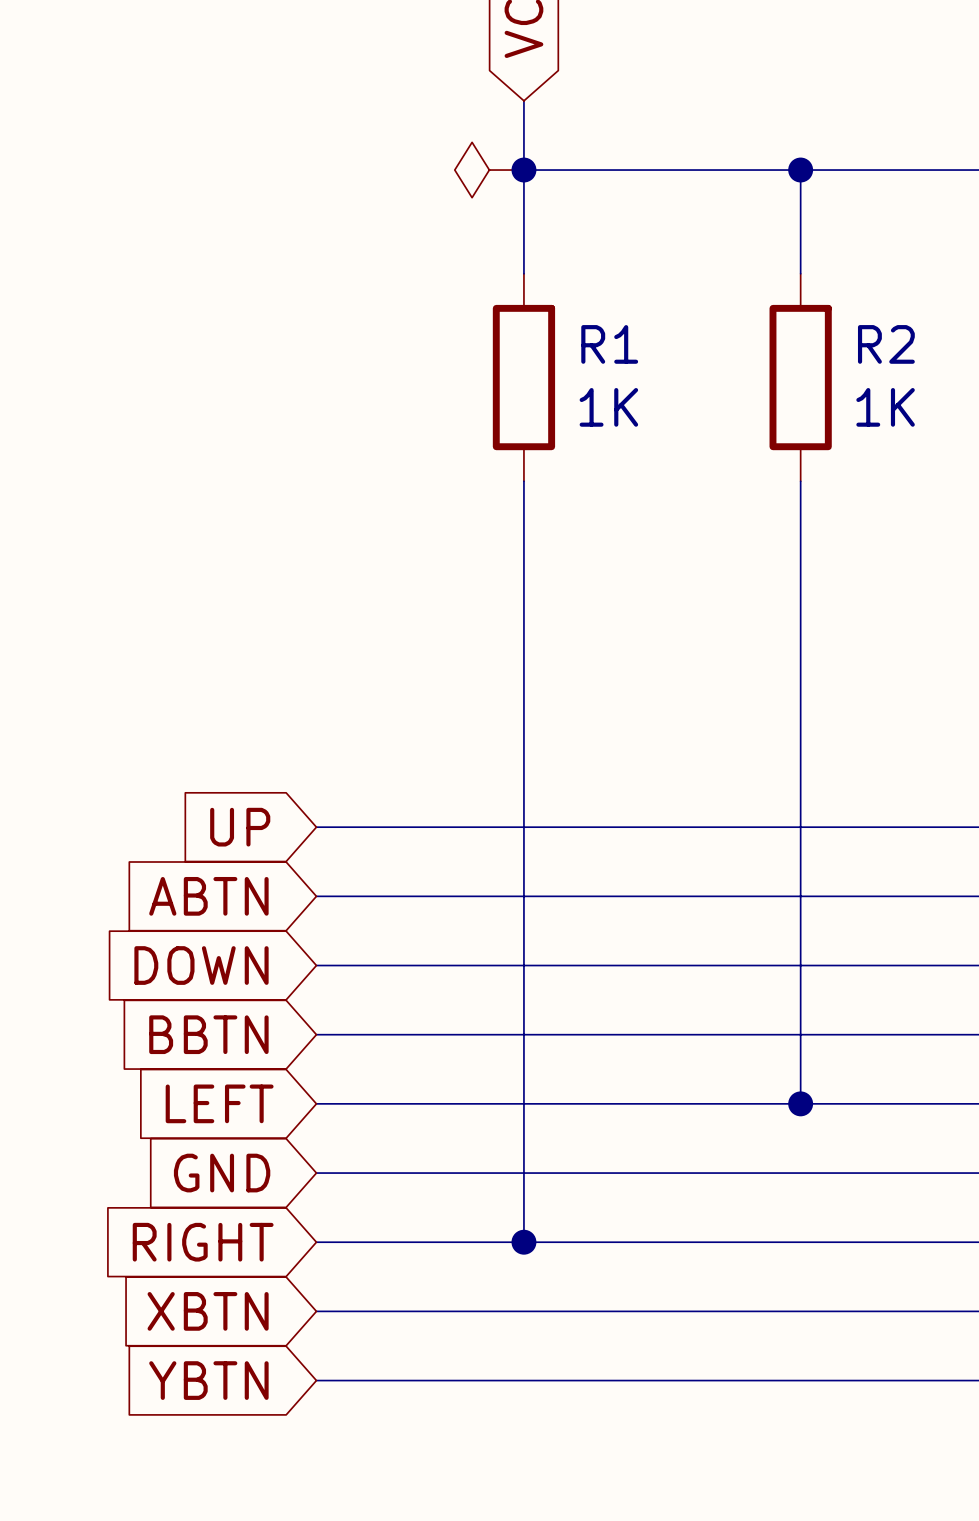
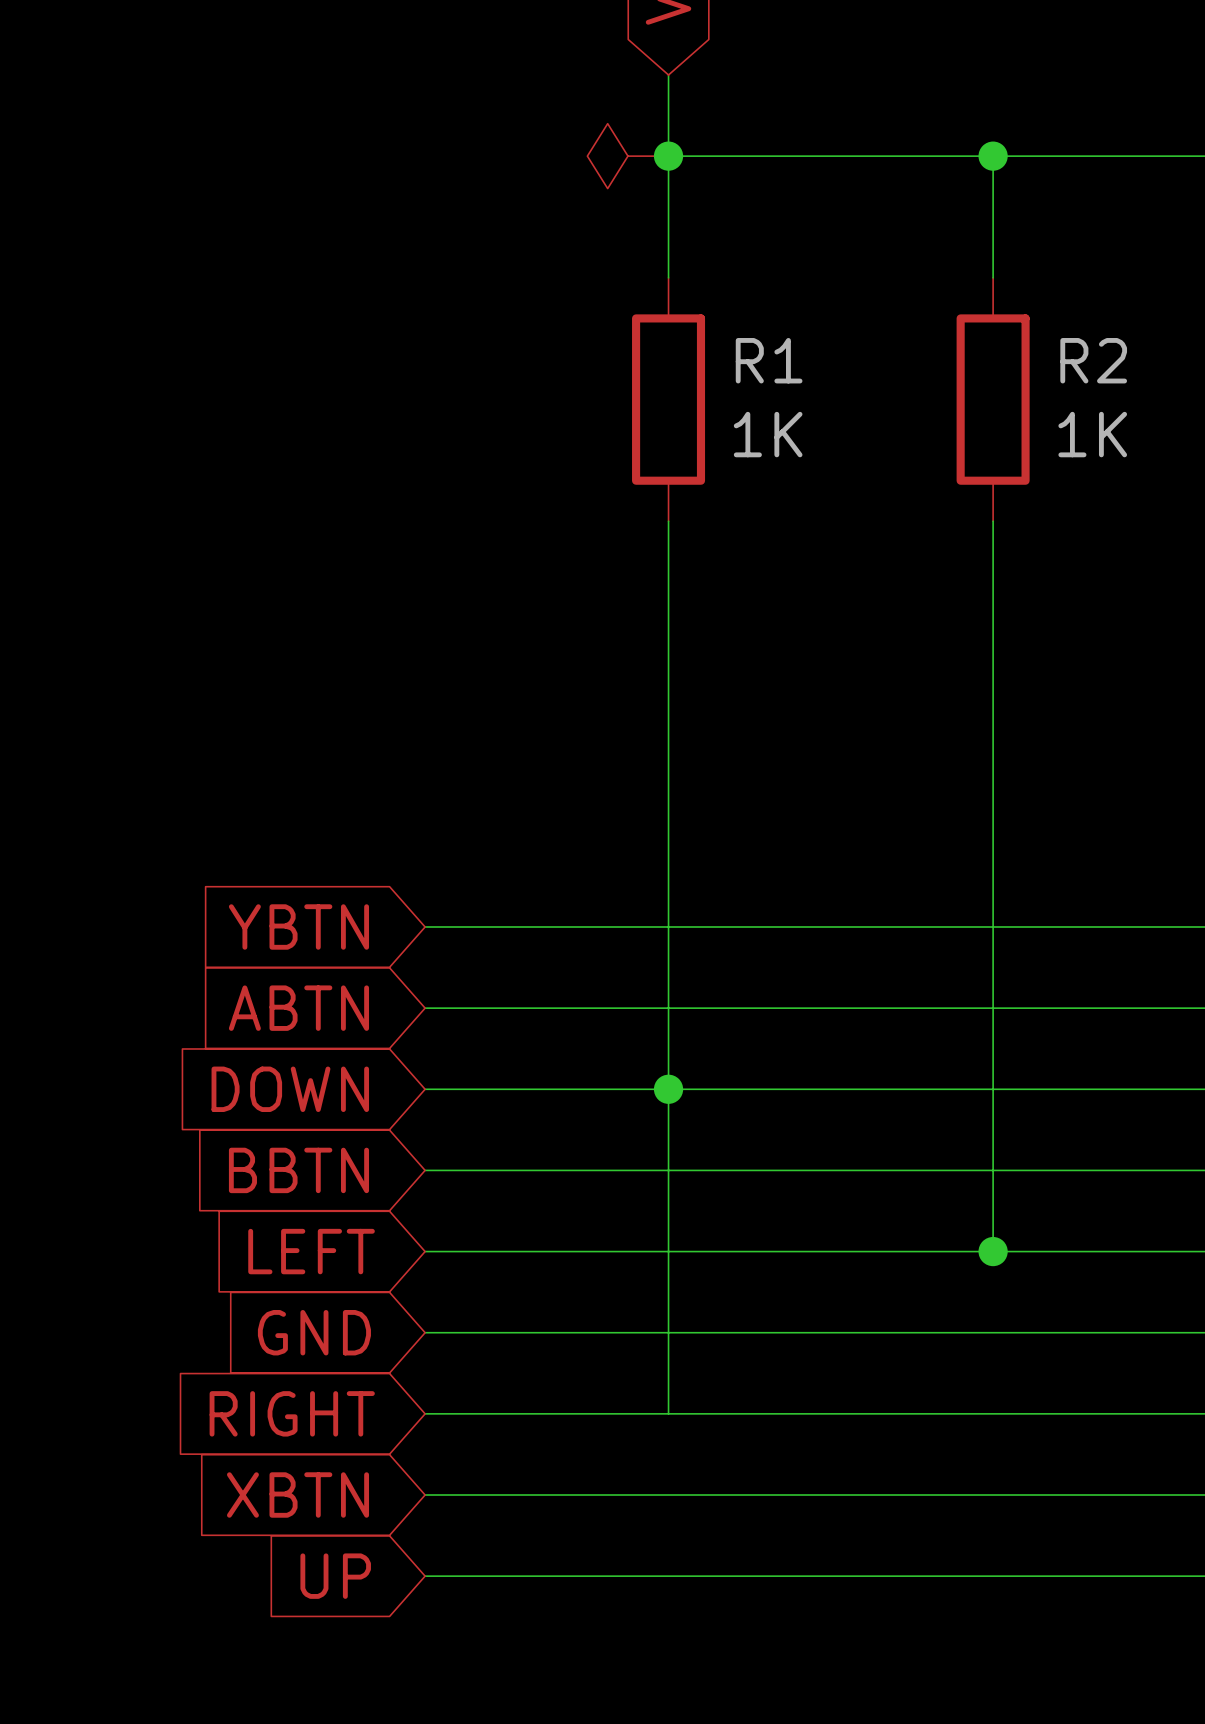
global label: UP (240, 827) -> YBTN (298, 926)
junction: none -> (668, 1089)
junction: (523, 1242) -> none
global label: YBTN (208, 1380) -> UP (335, 1576)

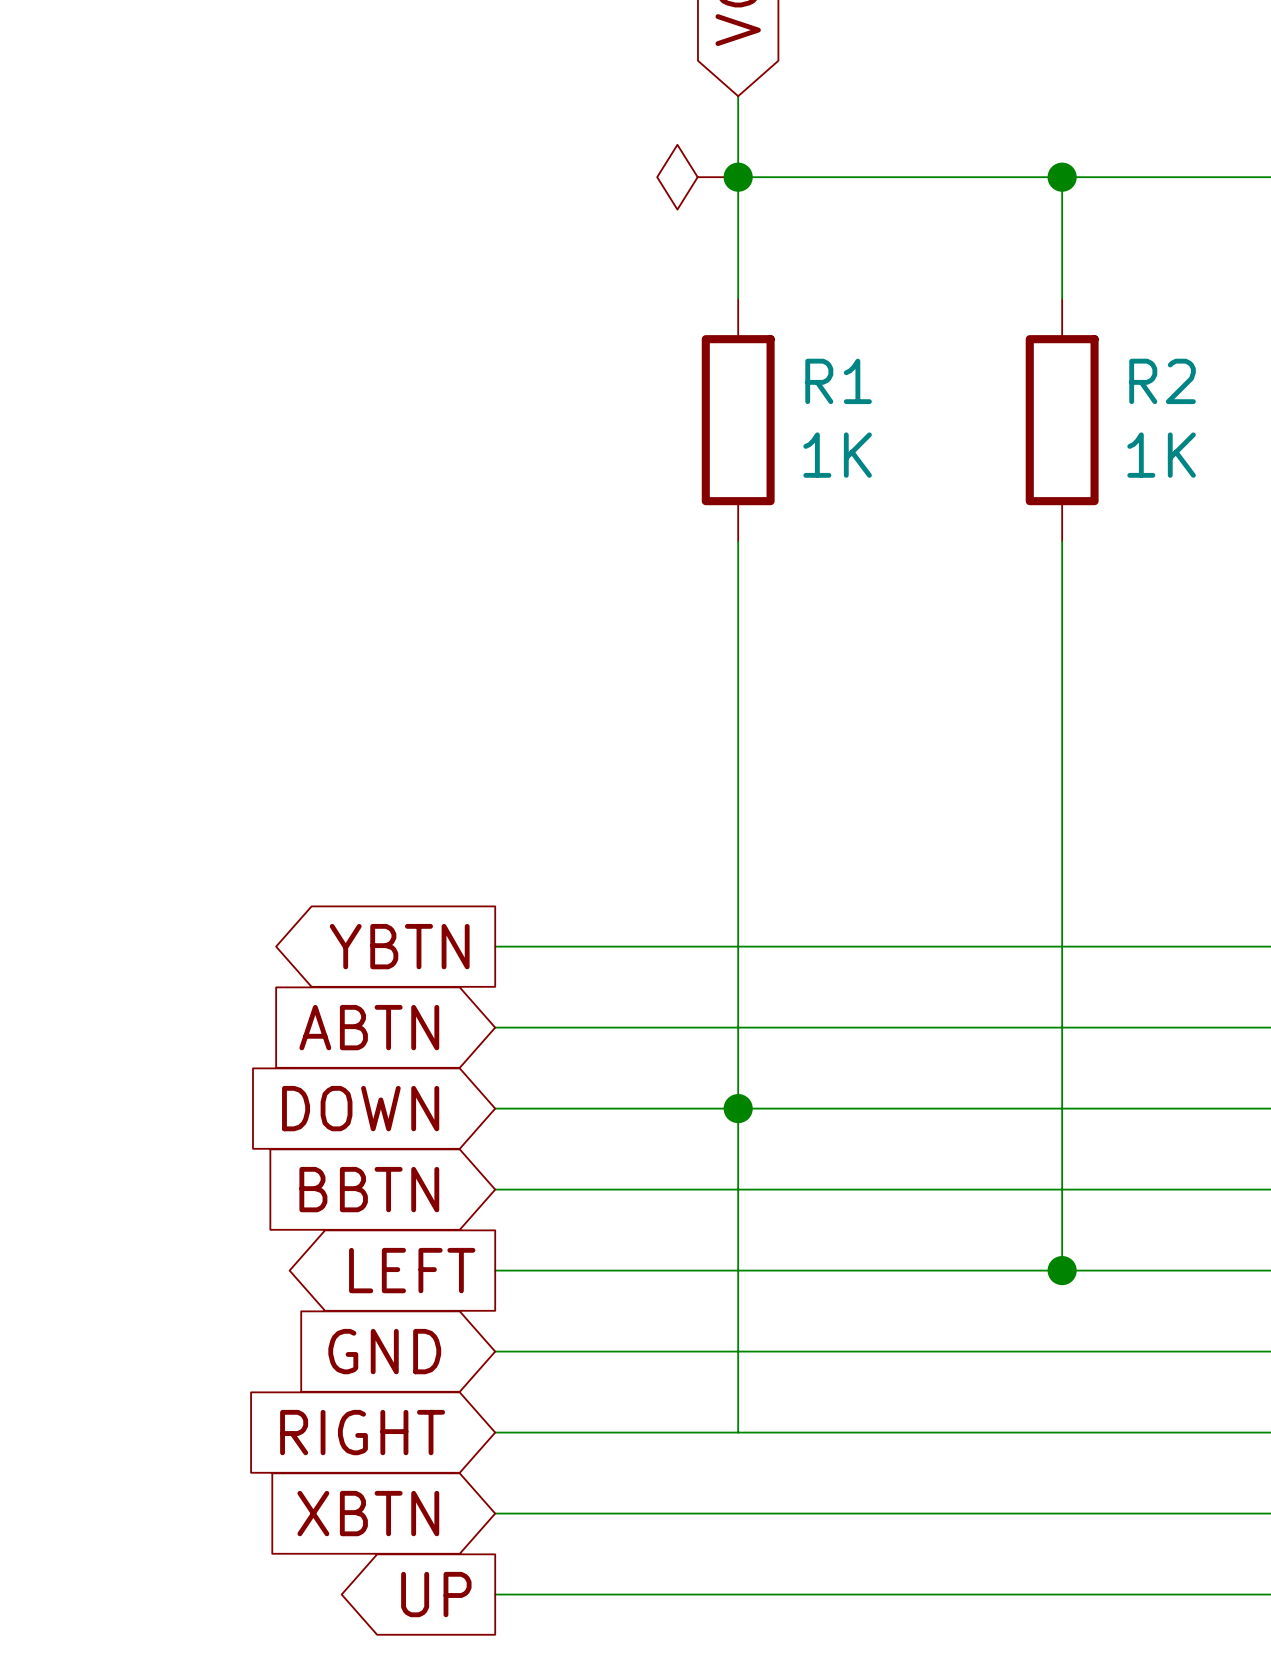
global label shape: input (298, 926) -> output (399, 946)
global label shape: input (311, 1251) -> output (412, 1270)
global label shape: input (335, 1576) -> output (436, 1594)

